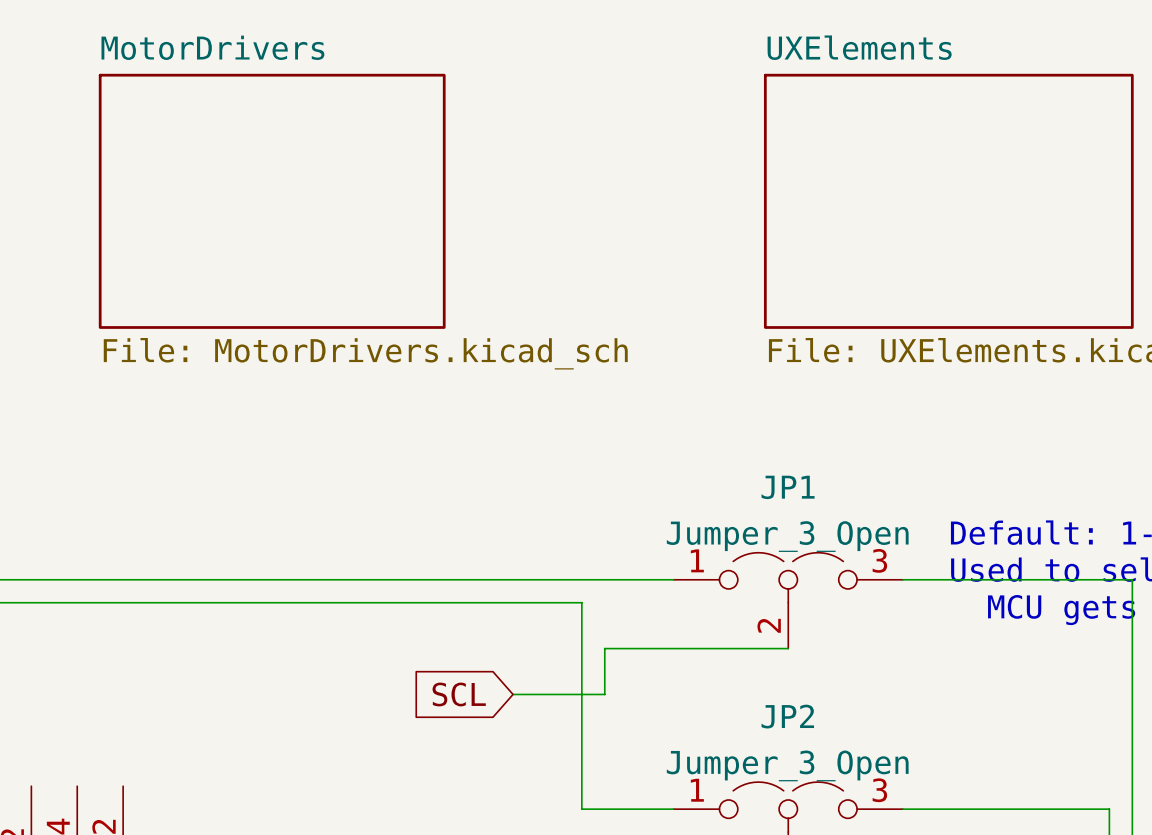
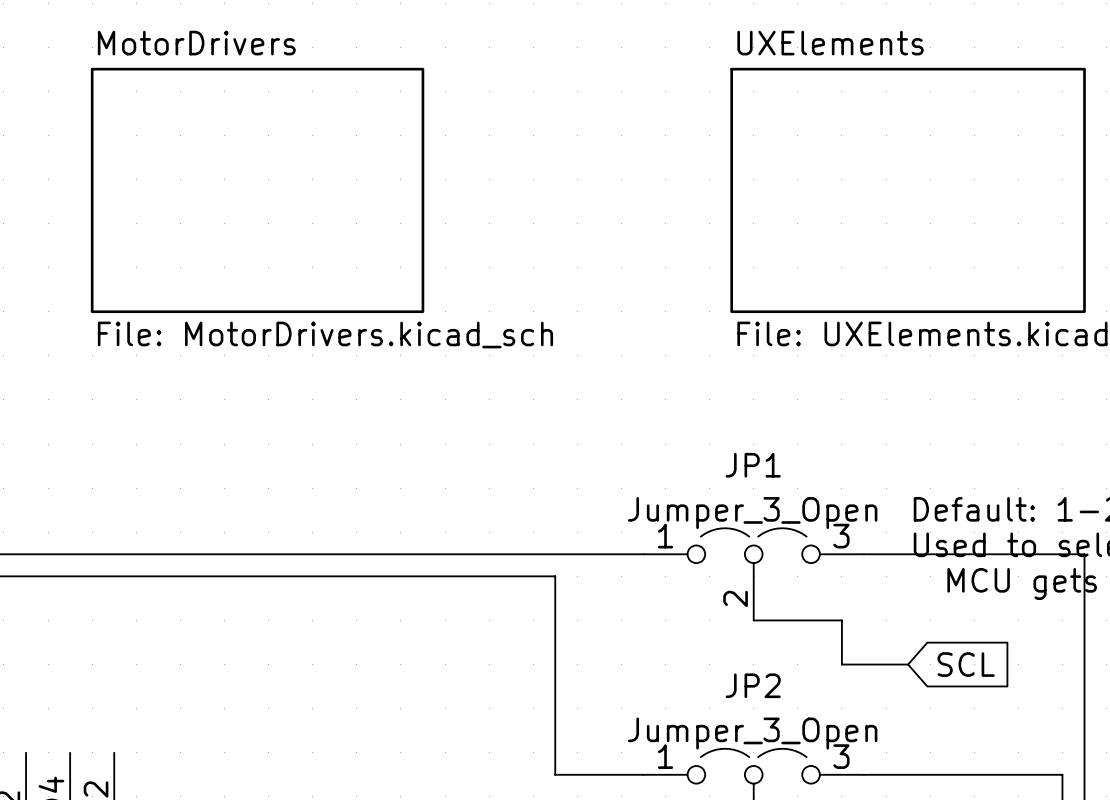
wire: (788, 648) (604, 648) (604, 694) (513, 694) -> (753, 620) (841, 620) (841, 664) (908, 664)
global label rotation: 0° (459, 694) -> 180° (966, 664)
global label position: SCL (459, 694) -> SCL (966, 664)

